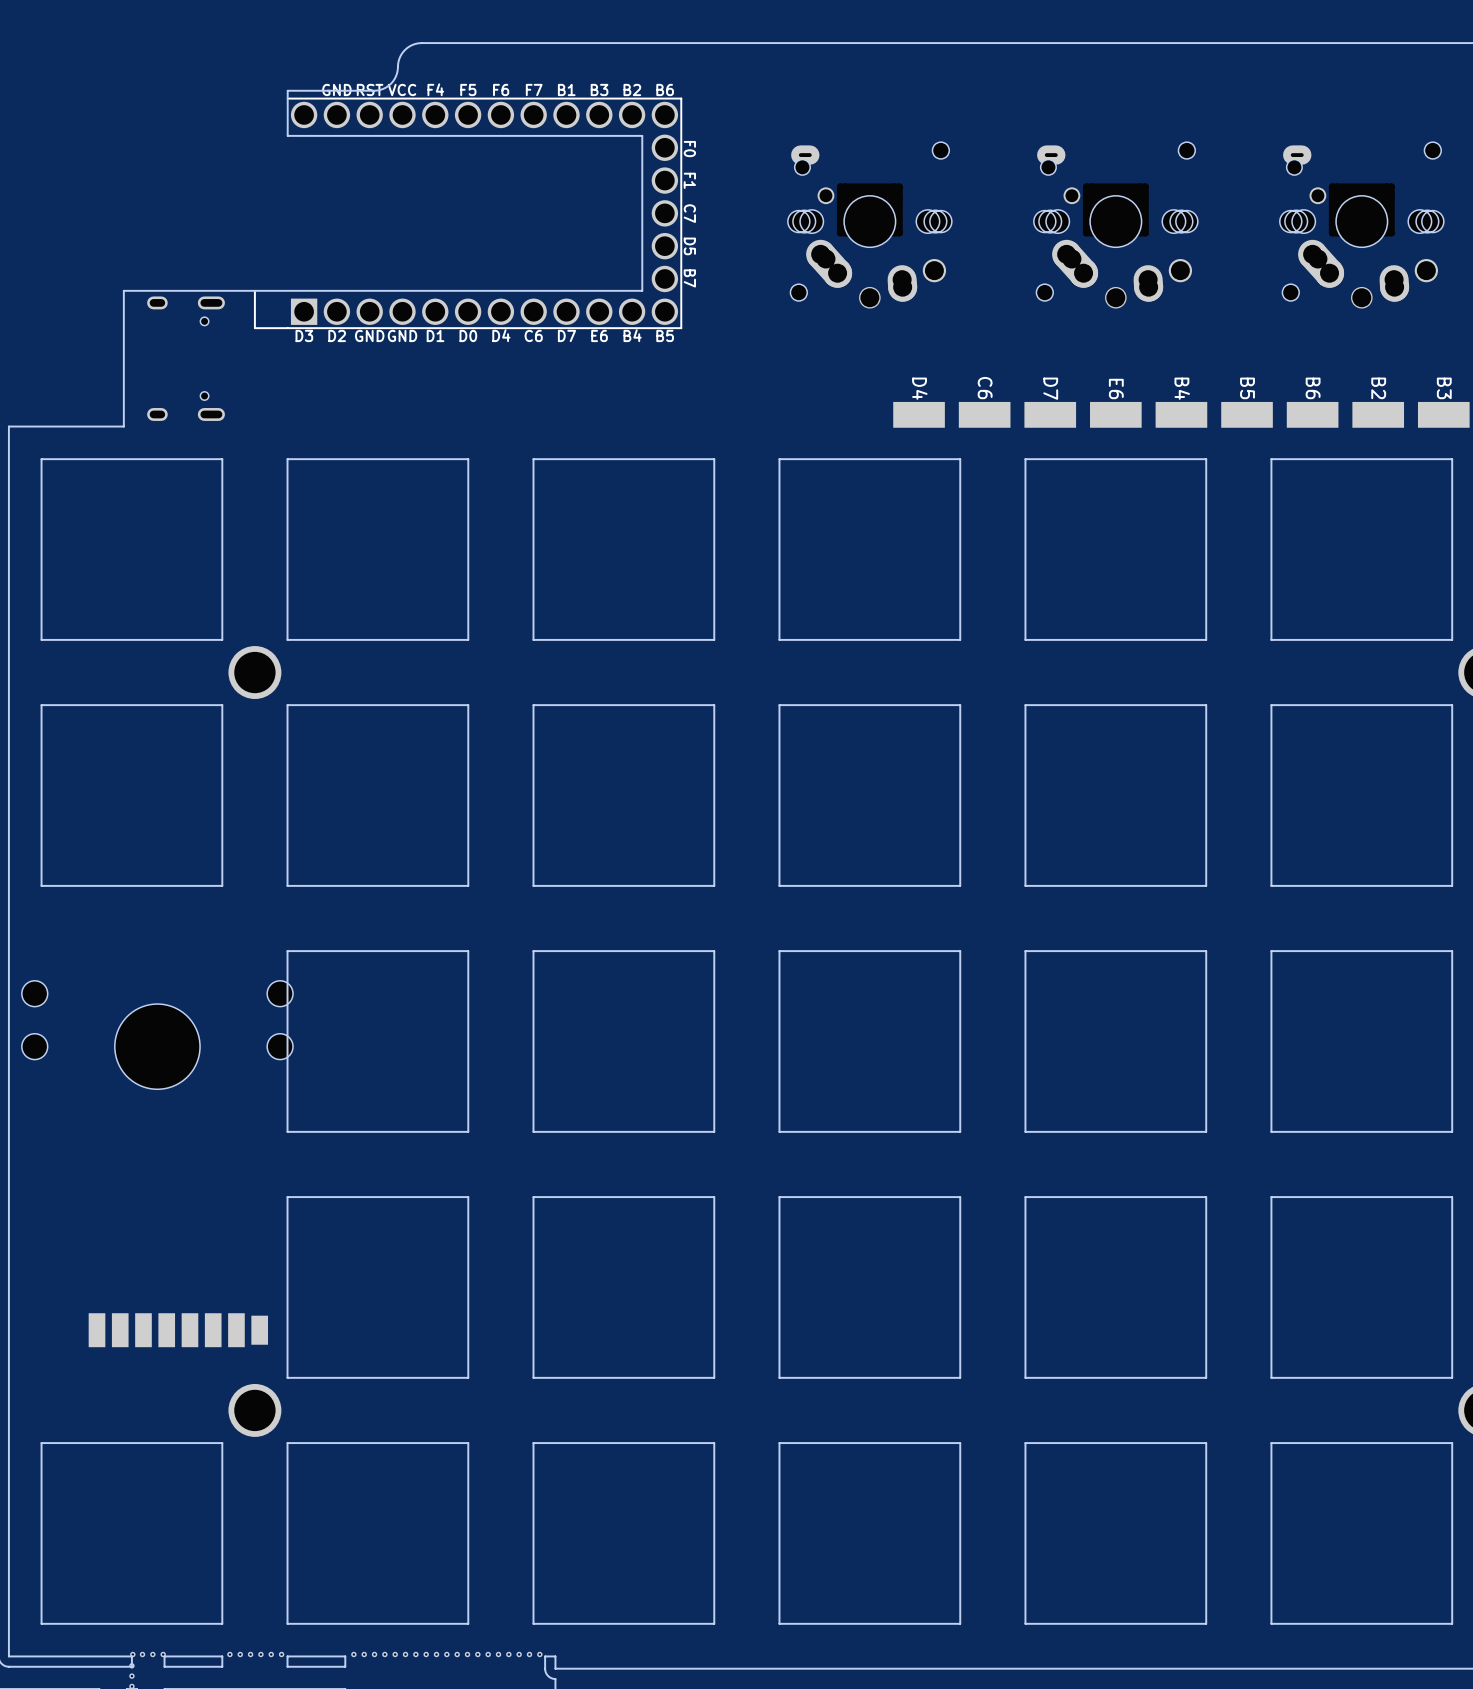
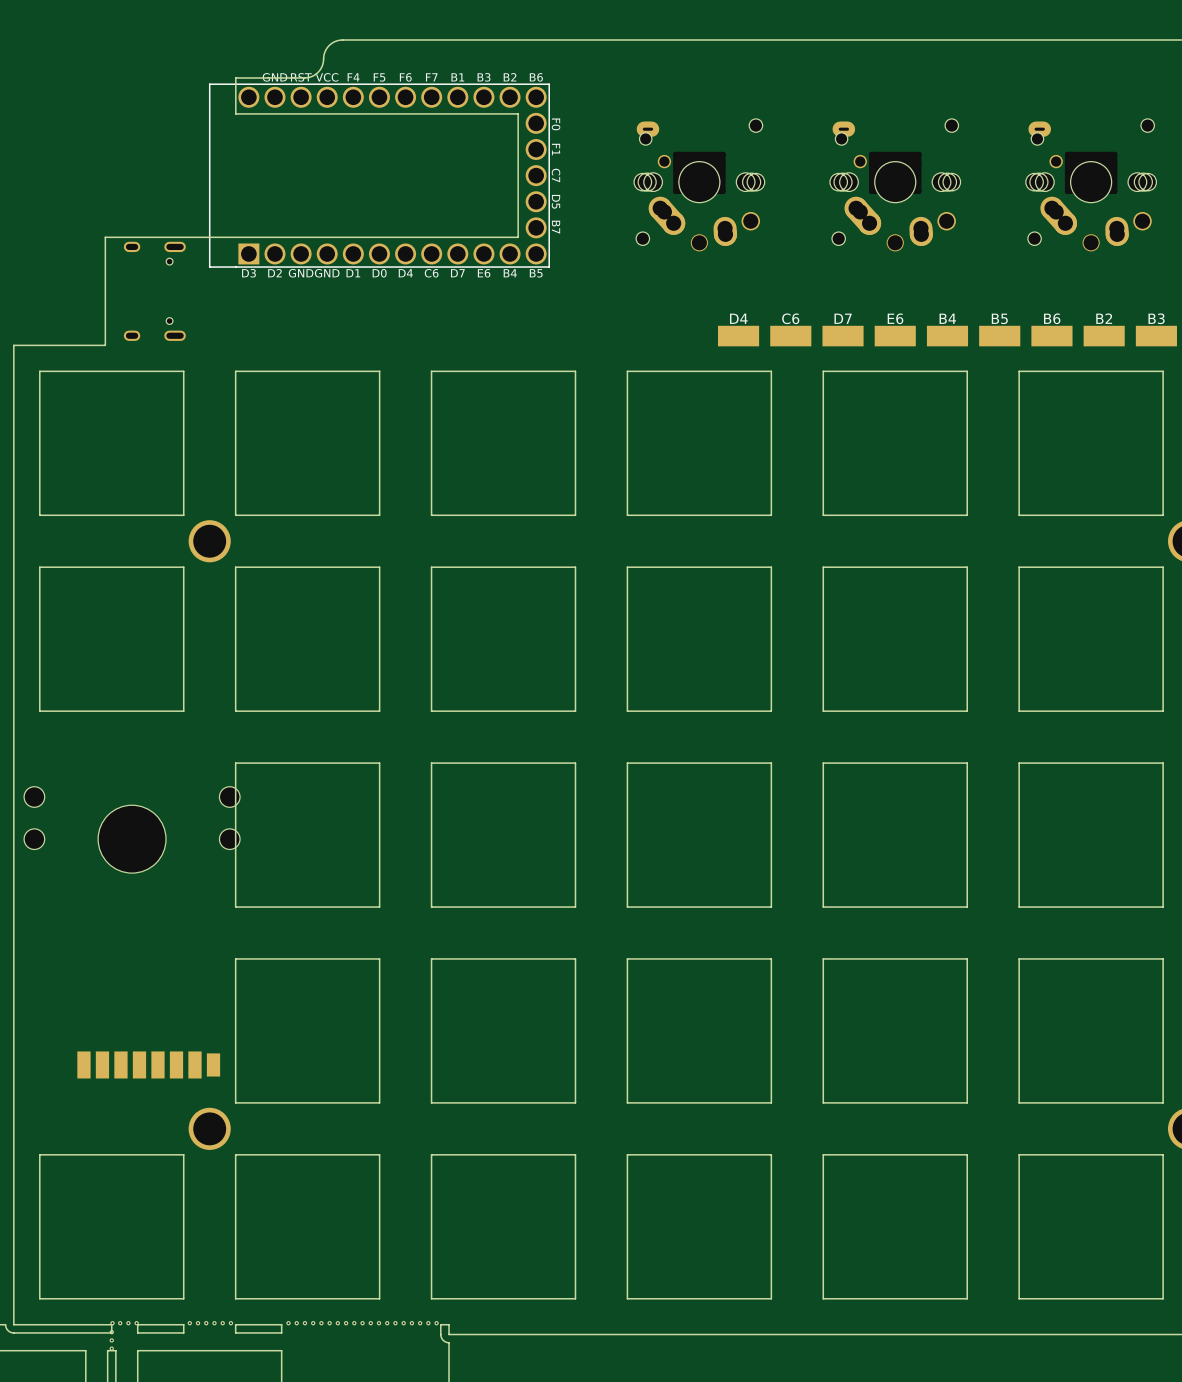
part footprint: [253, 97, 683, 330] -> [208, 83, 550, 268]
part value rotation: 0° (919, 388) -> 90° counterclockwise (738, 318)
part value rotation: 0° (985, 388) -> 90° counterclockwise (790, 318)
part value rotation: 0° (1050, 388) -> 90° counterclockwise (843, 318)
part value rotation: 0° (1116, 388) -> 90° counterclockwise (895, 318)
part value rotation: 0° (1182, 388) -> 90° counterclockwise (947, 318)
part value rotation: 0° (1247, 388) -> 90° counterclockwise (999, 318)
part value rotation: 0° (1313, 388) -> 90° counterclockwise (1052, 318)
part value rotation: 0° (1378, 388) -> 90° counterclockwise (1104, 318)
part value rotation: 0° (1444, 388) -> 90° counterclockwise (1156, 318)

